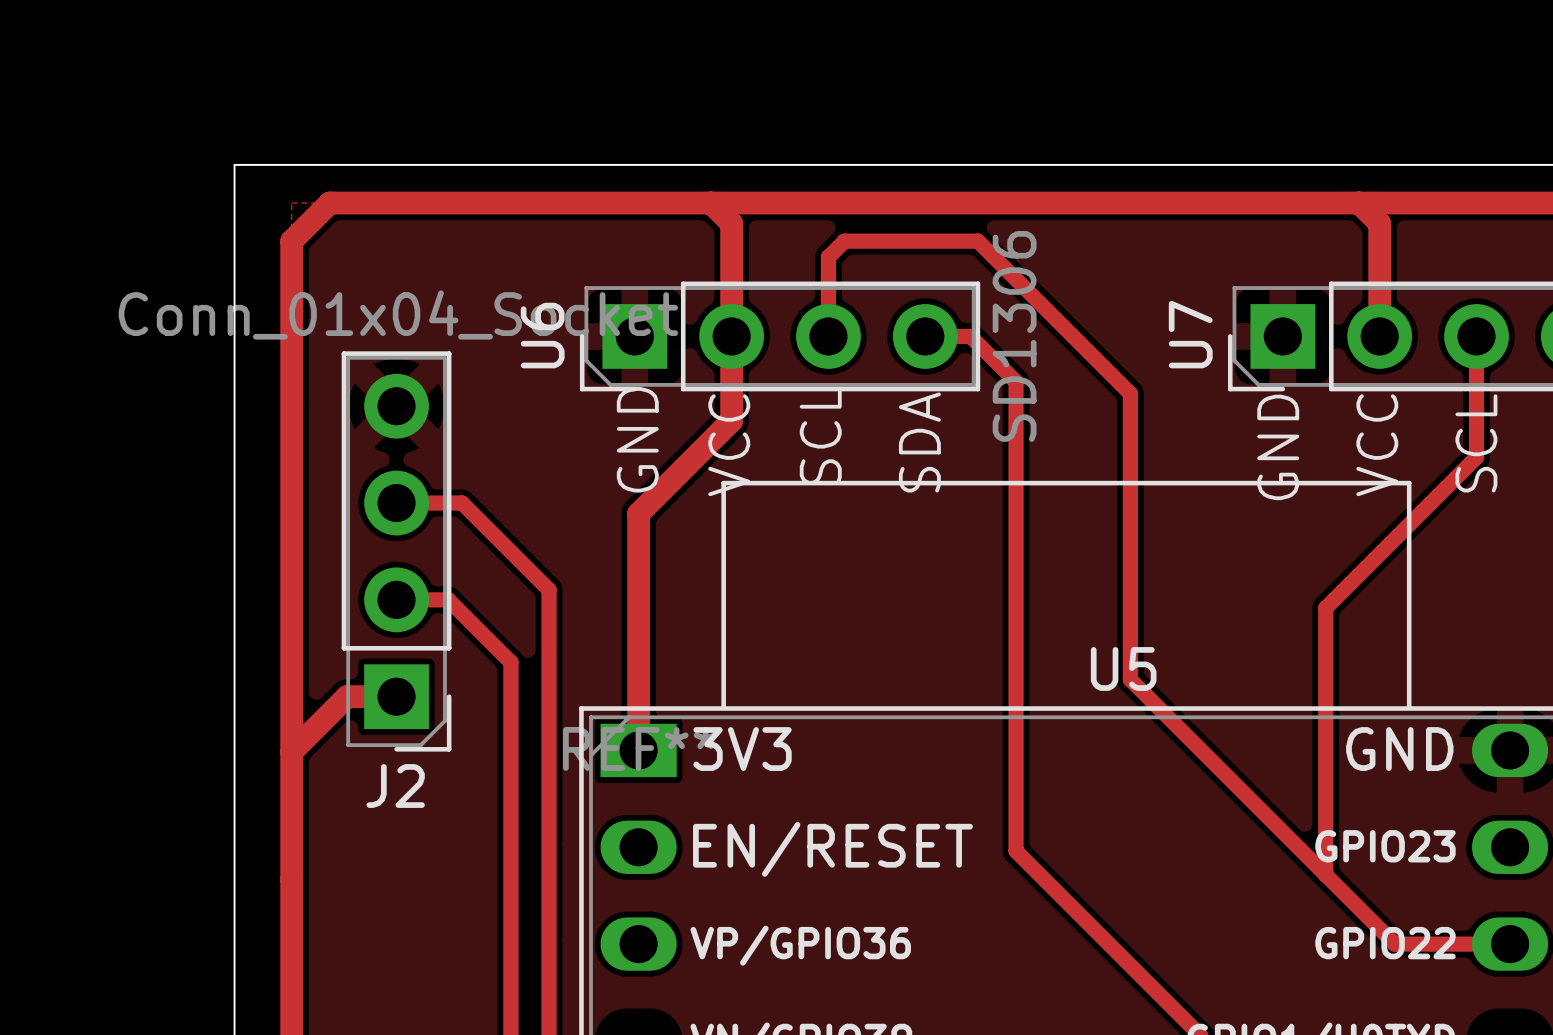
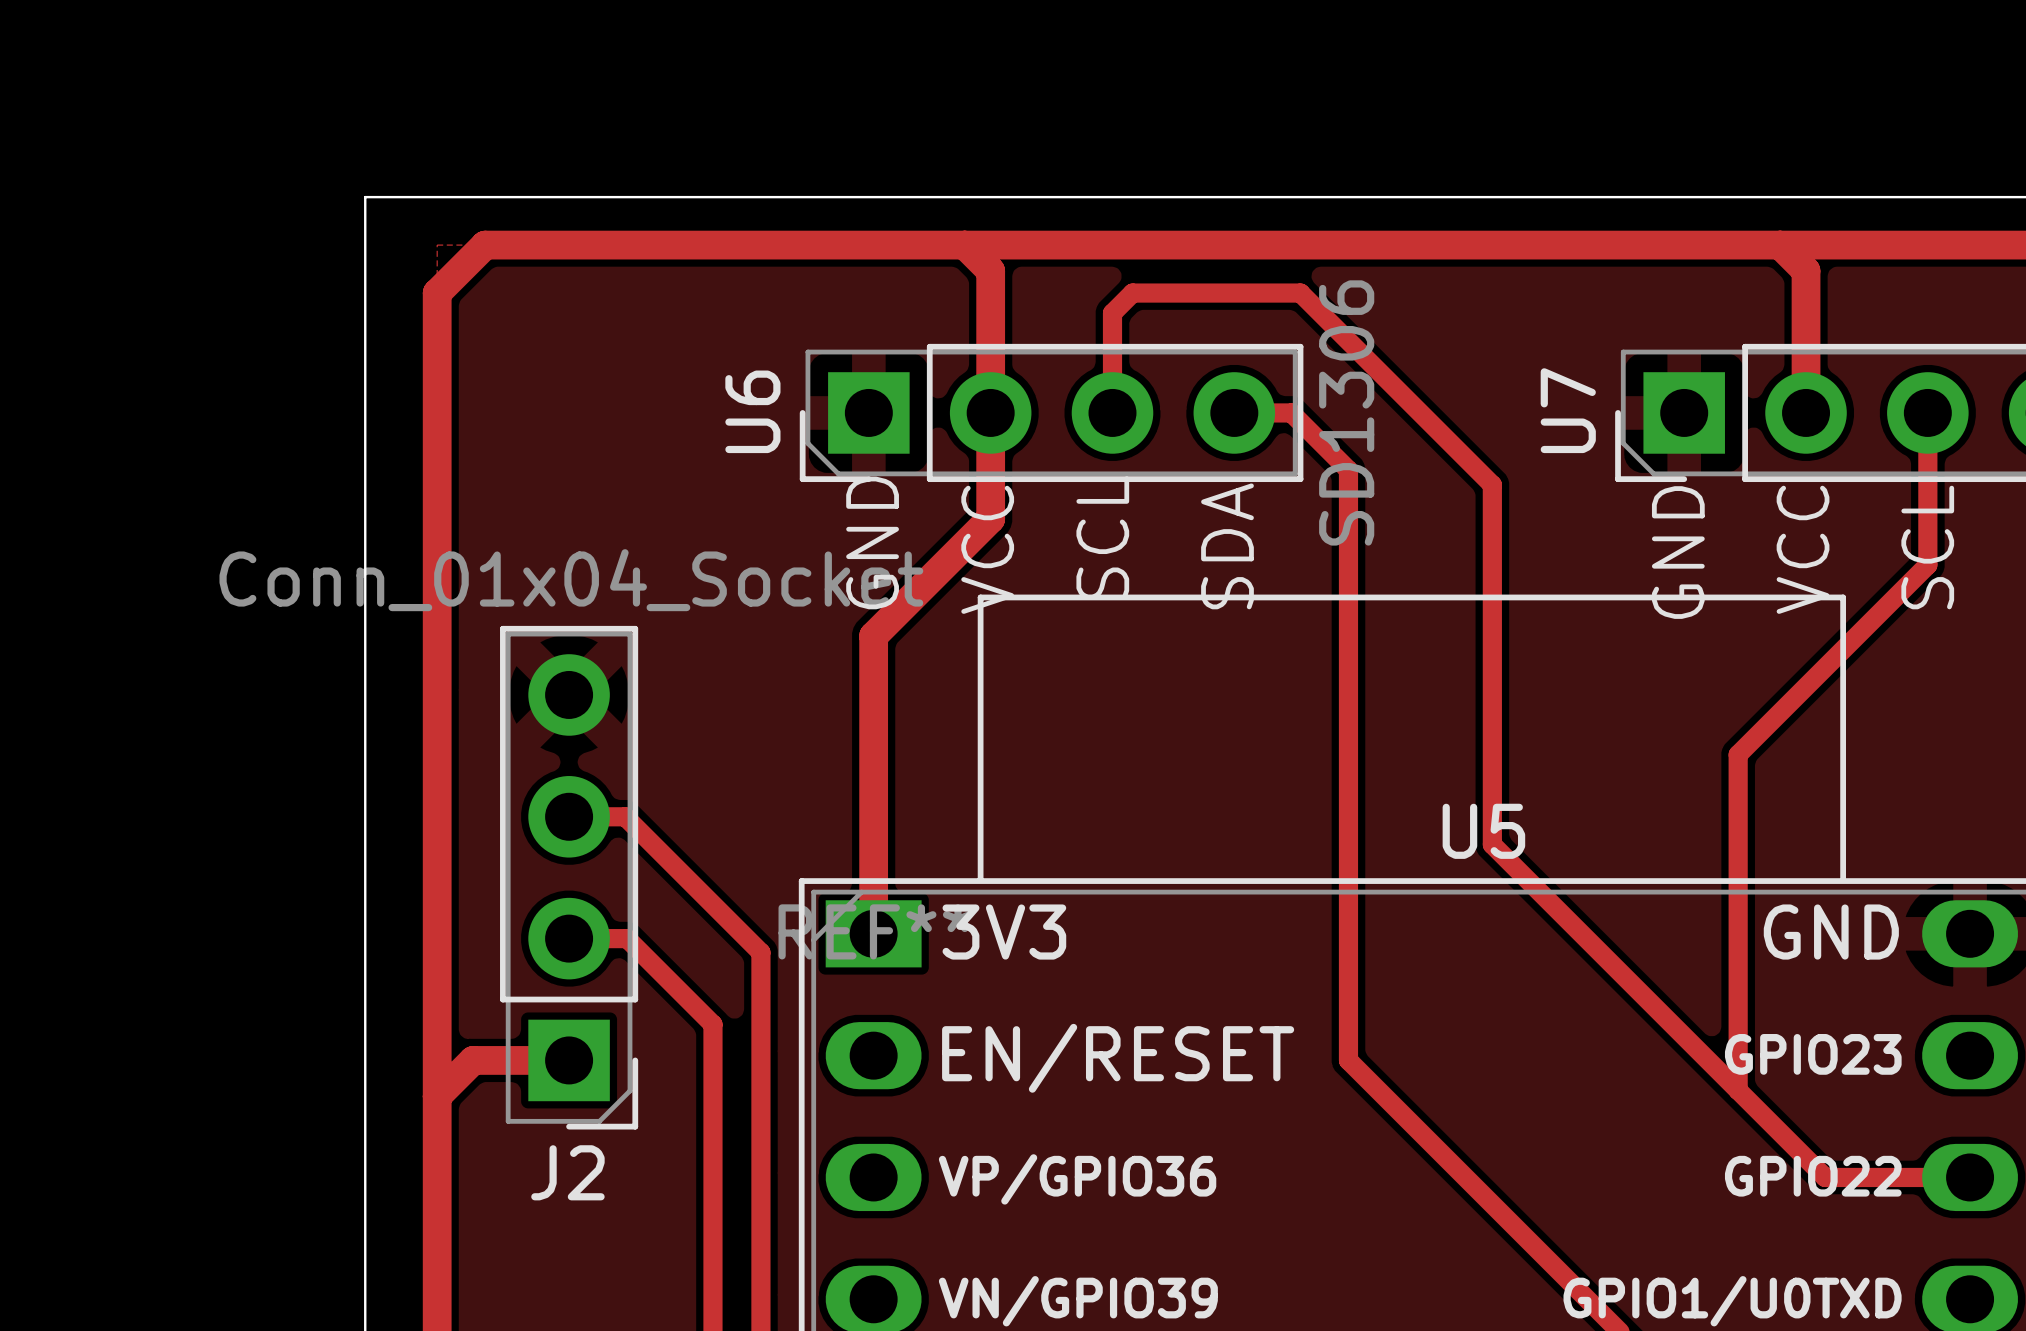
track: (396, 503) (462, 503) (549, 589) (549, 765) -> (569, 816) (625, 816) (760, 952)
J2 position: (396, 551) -> (569, 877)
track: (396, 599) (448, 599) (510, 662) (510, 822) -> (569, 938) (627, 938) (712, 1024)
track: (396, 696) (347, 696) (291, 751) -> none
track: none -> (569, 1060) (473, 1060) (437, 1096)

